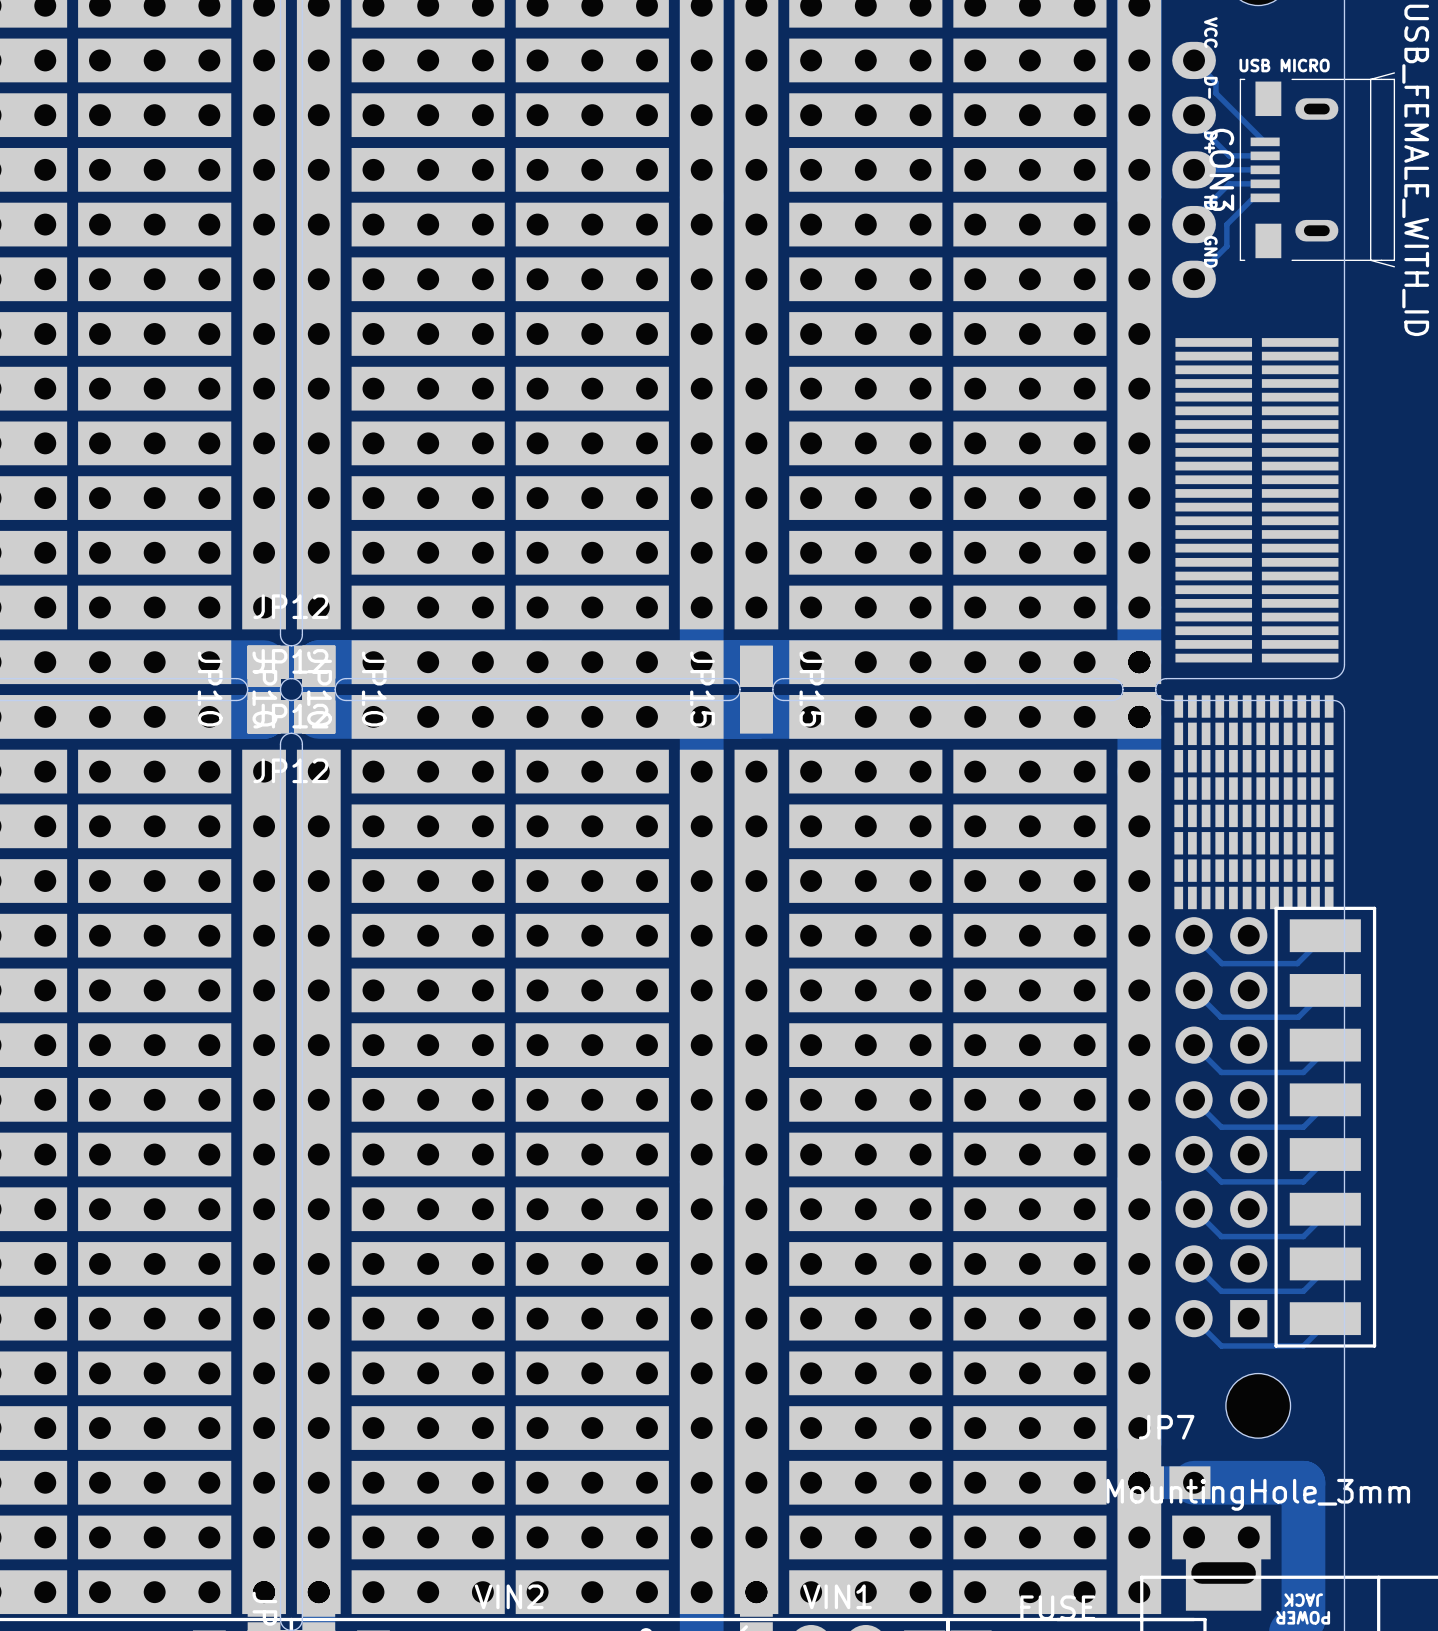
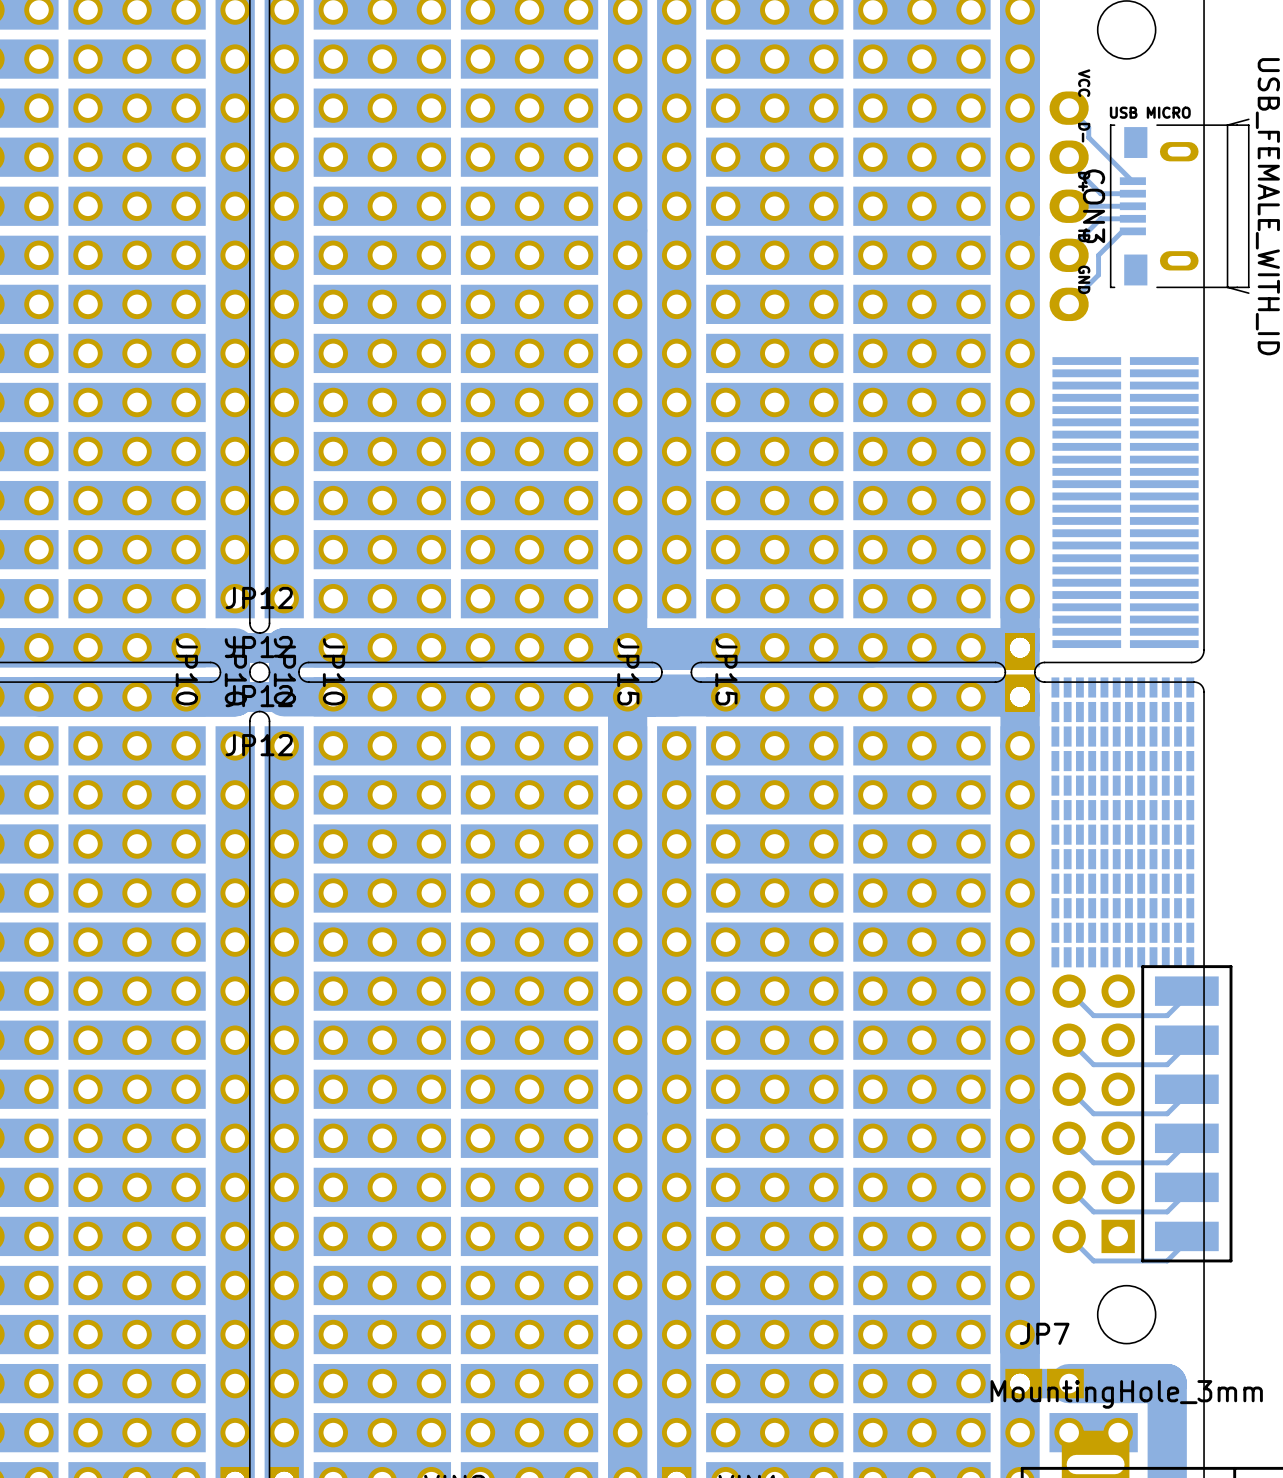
track: (1306, 935) (1325, 935) (1297, 963) (1221, 963) (1194, 935) -> none
part: none -> (1122, 920)
track: (1306, 990) (1325, 990) (1298, 1017) (1220, 1017) (1194, 990) -> none
part: (1221, 1127) -> none
part: (1325, 1127) -> none
part: none -> (1186, 1113)

